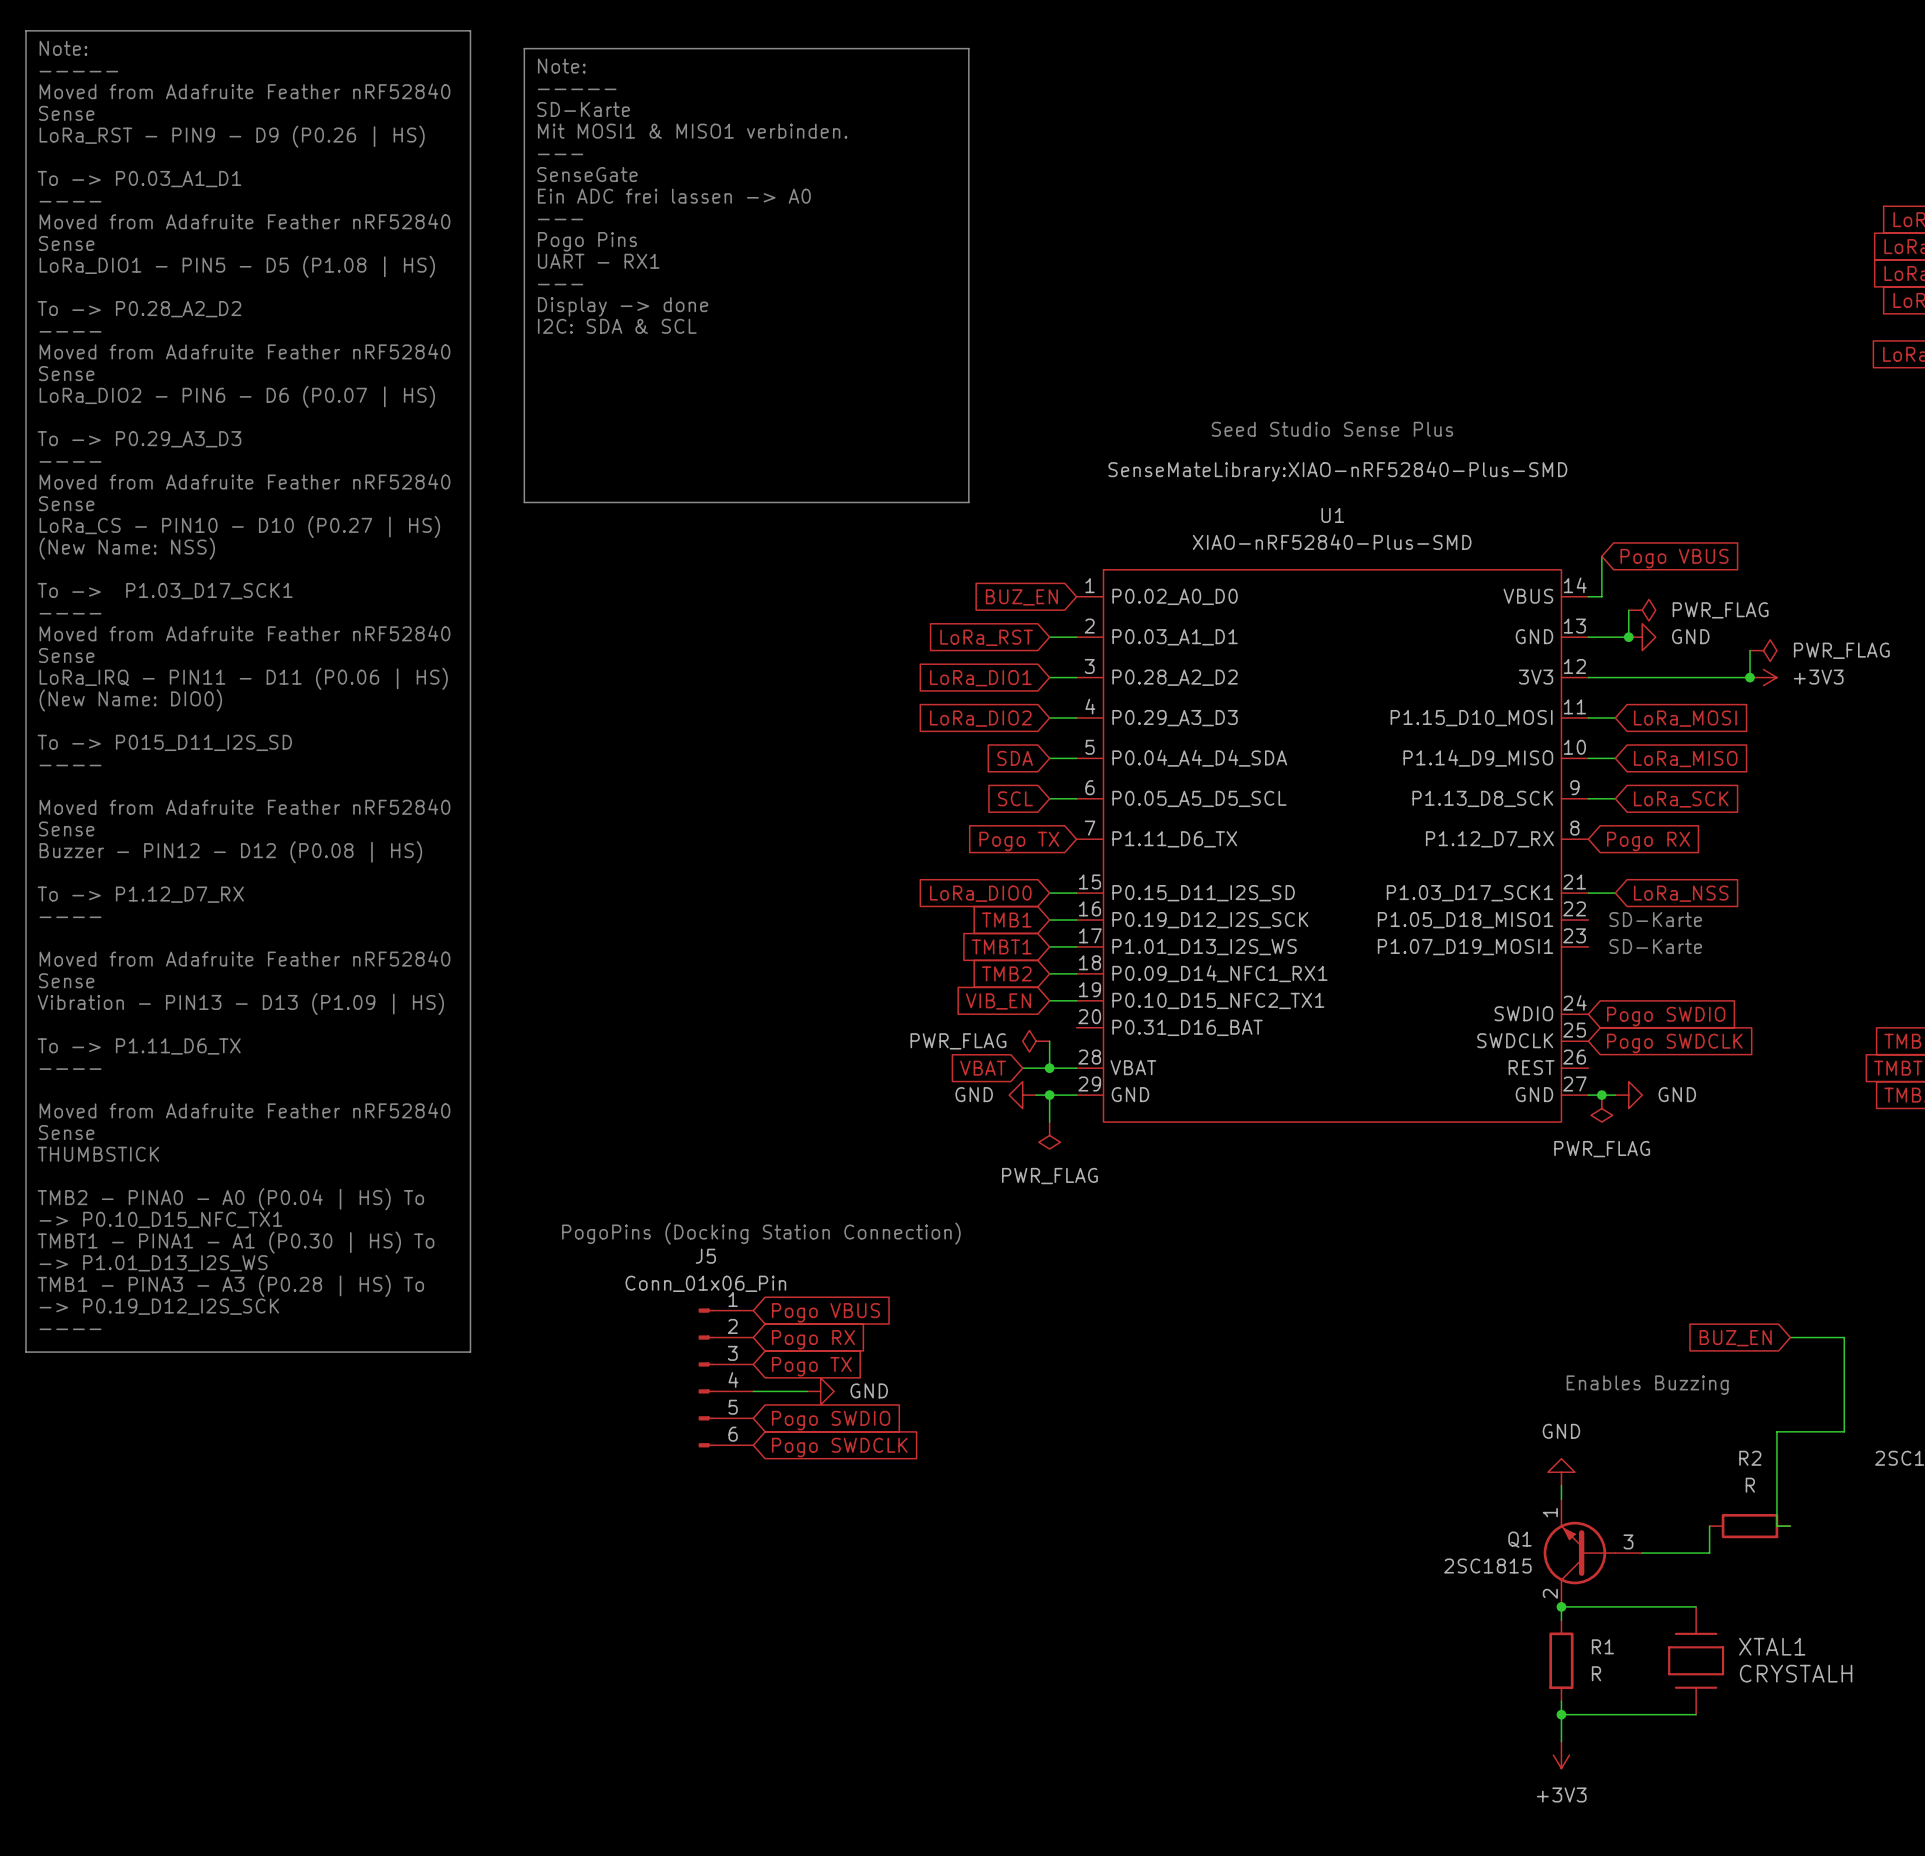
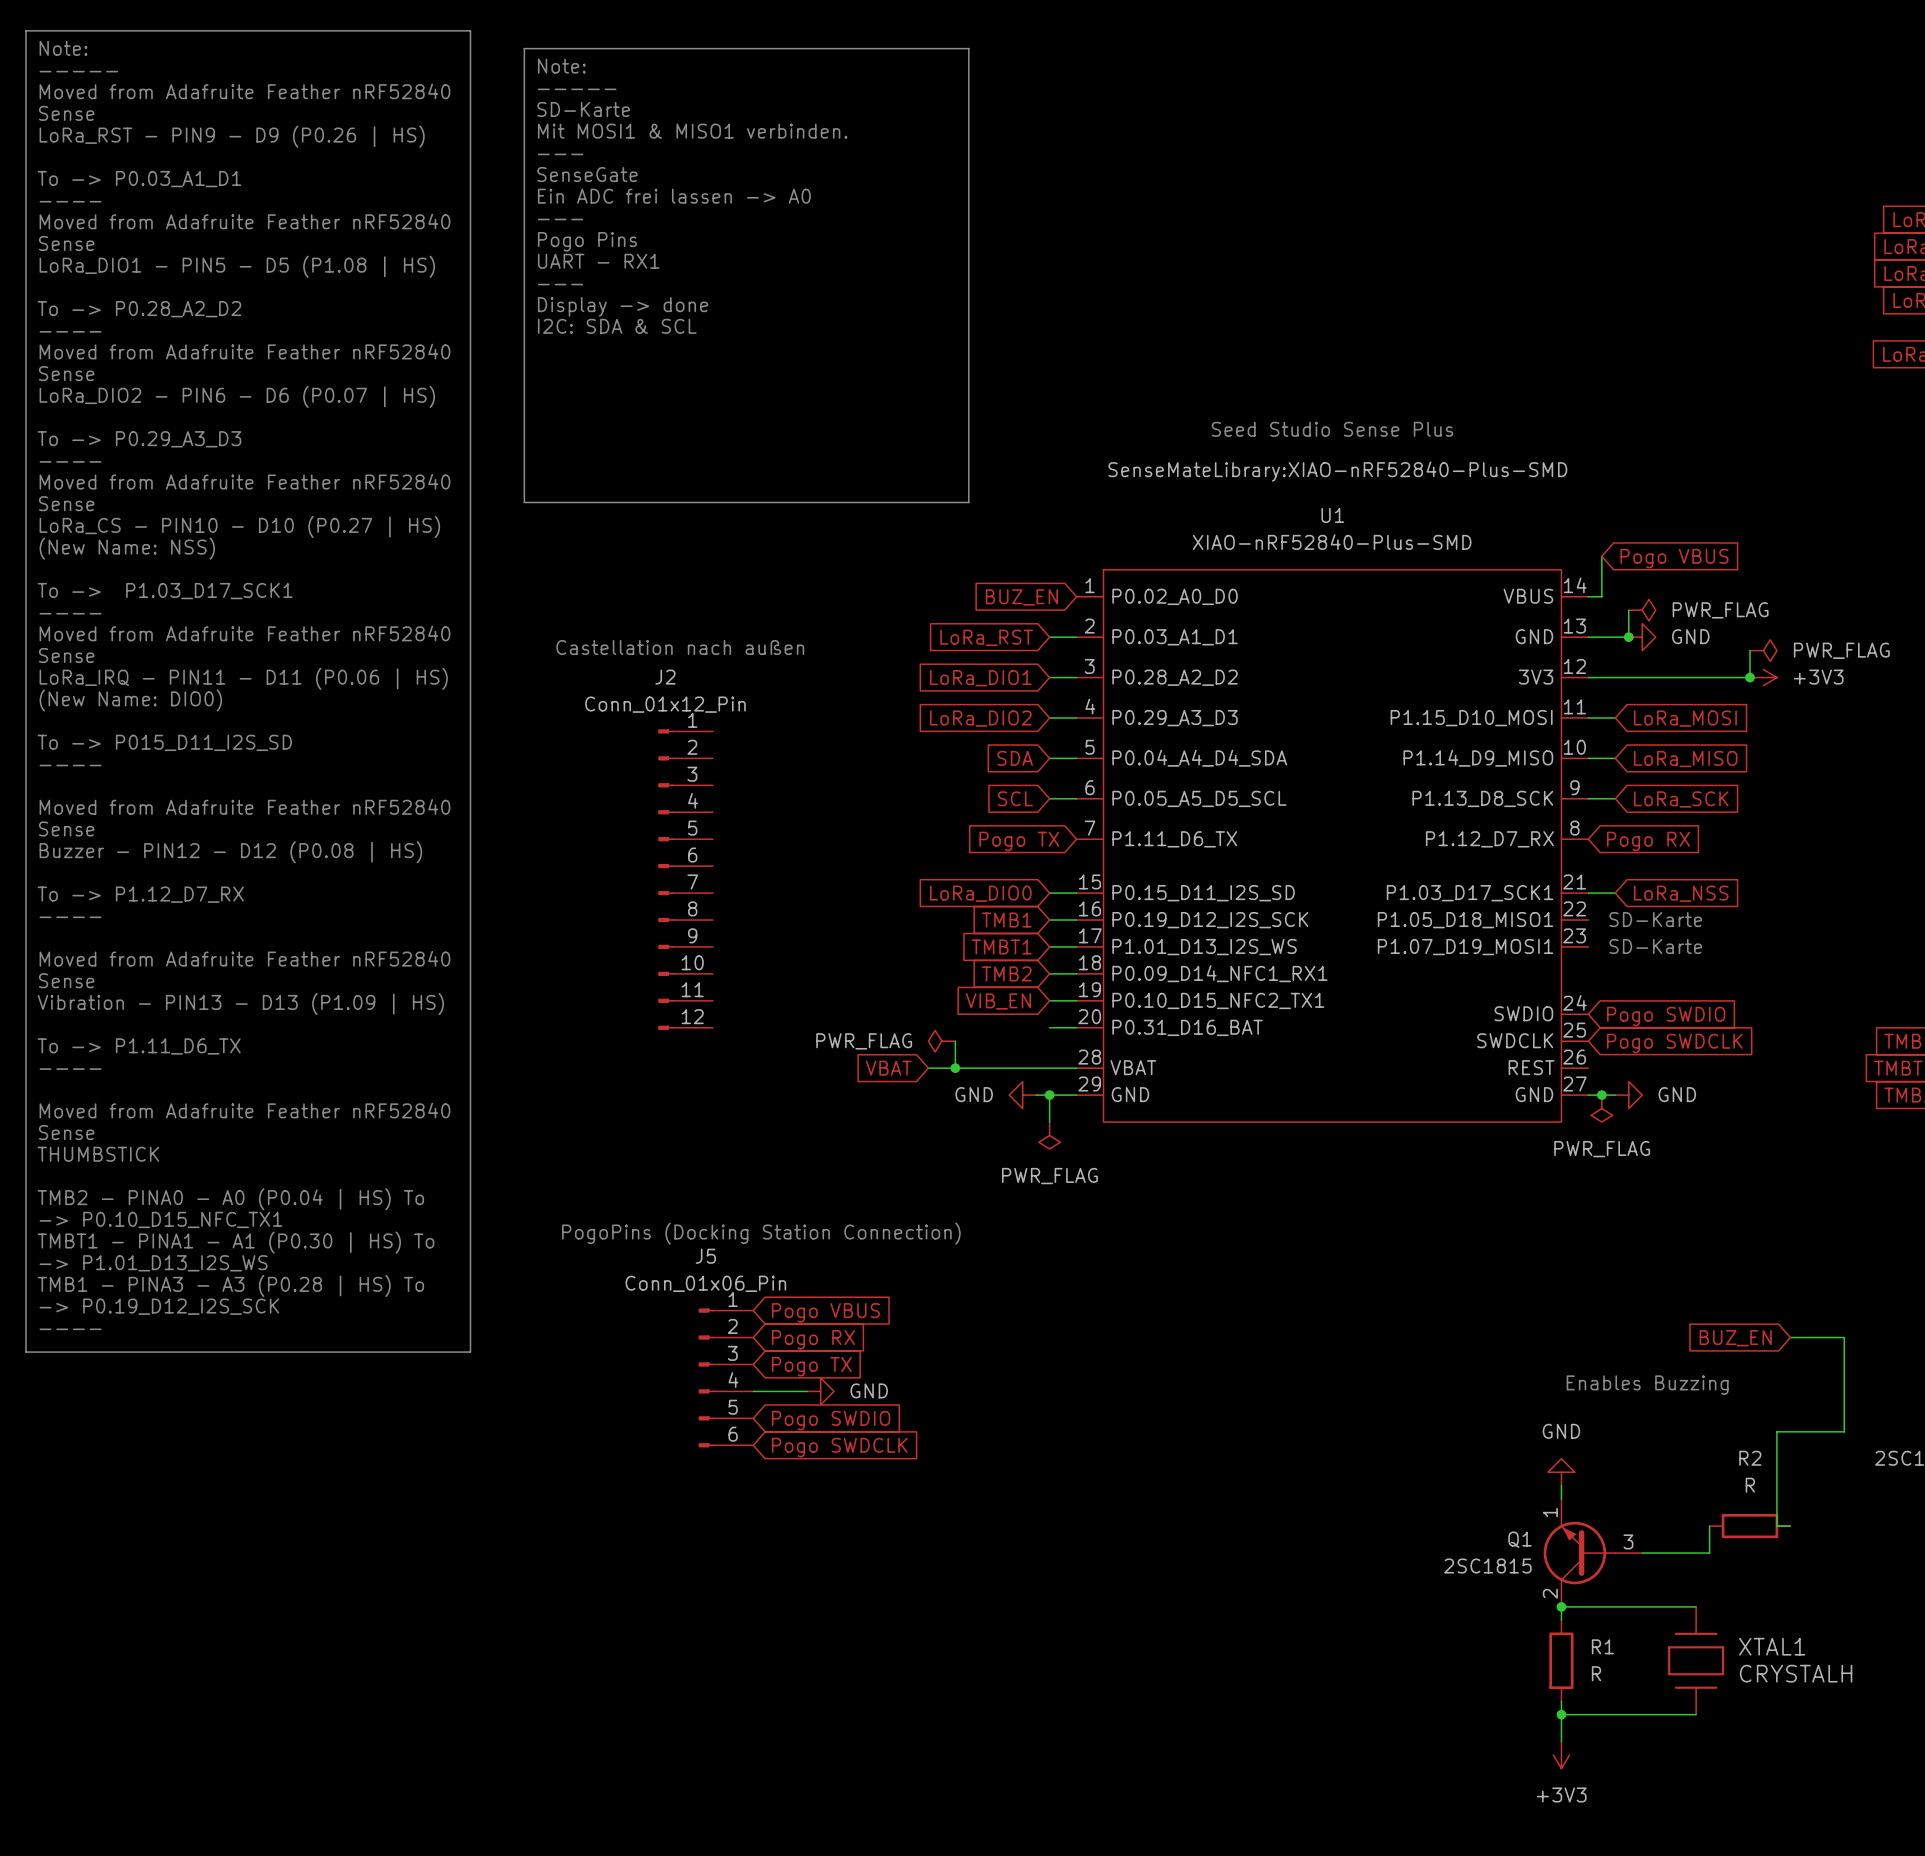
text: none -> Castellation nach außen (680, 647)
J2: none -> Conn_01x12_Pin (685, 879)
wire: none -> (1049, 1027) (1076, 1027)
power symbol position: PWR_FLAG (1036, 1041) -> PWR_FLAG (941, 1041)
wire: (1049, 1041) (1049, 1068) -> (955, 1041) (955, 1068)
wire: none -> (928, 1068) (1022, 1068)
junction: none -> (955, 1068)
global label position: VBAT (983, 1068) -> VBAT (888, 1068)
junction: (1049, 1068) -> none

